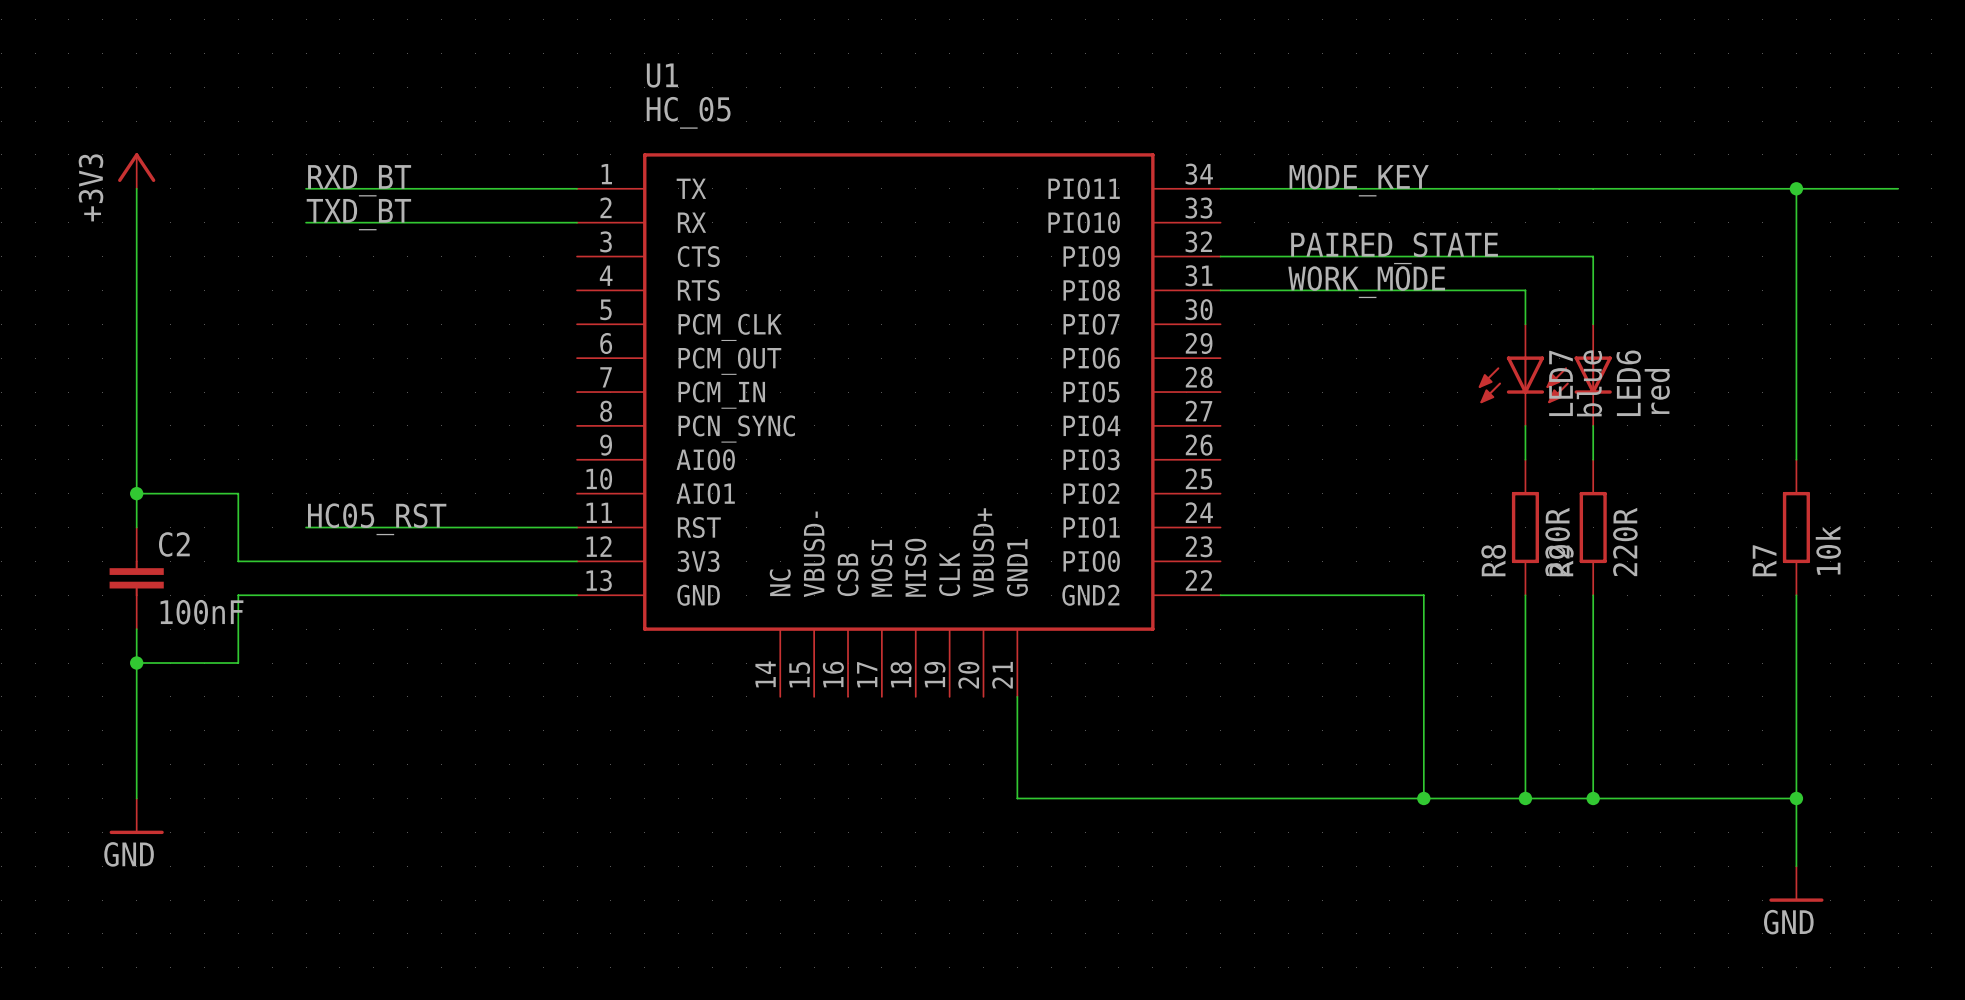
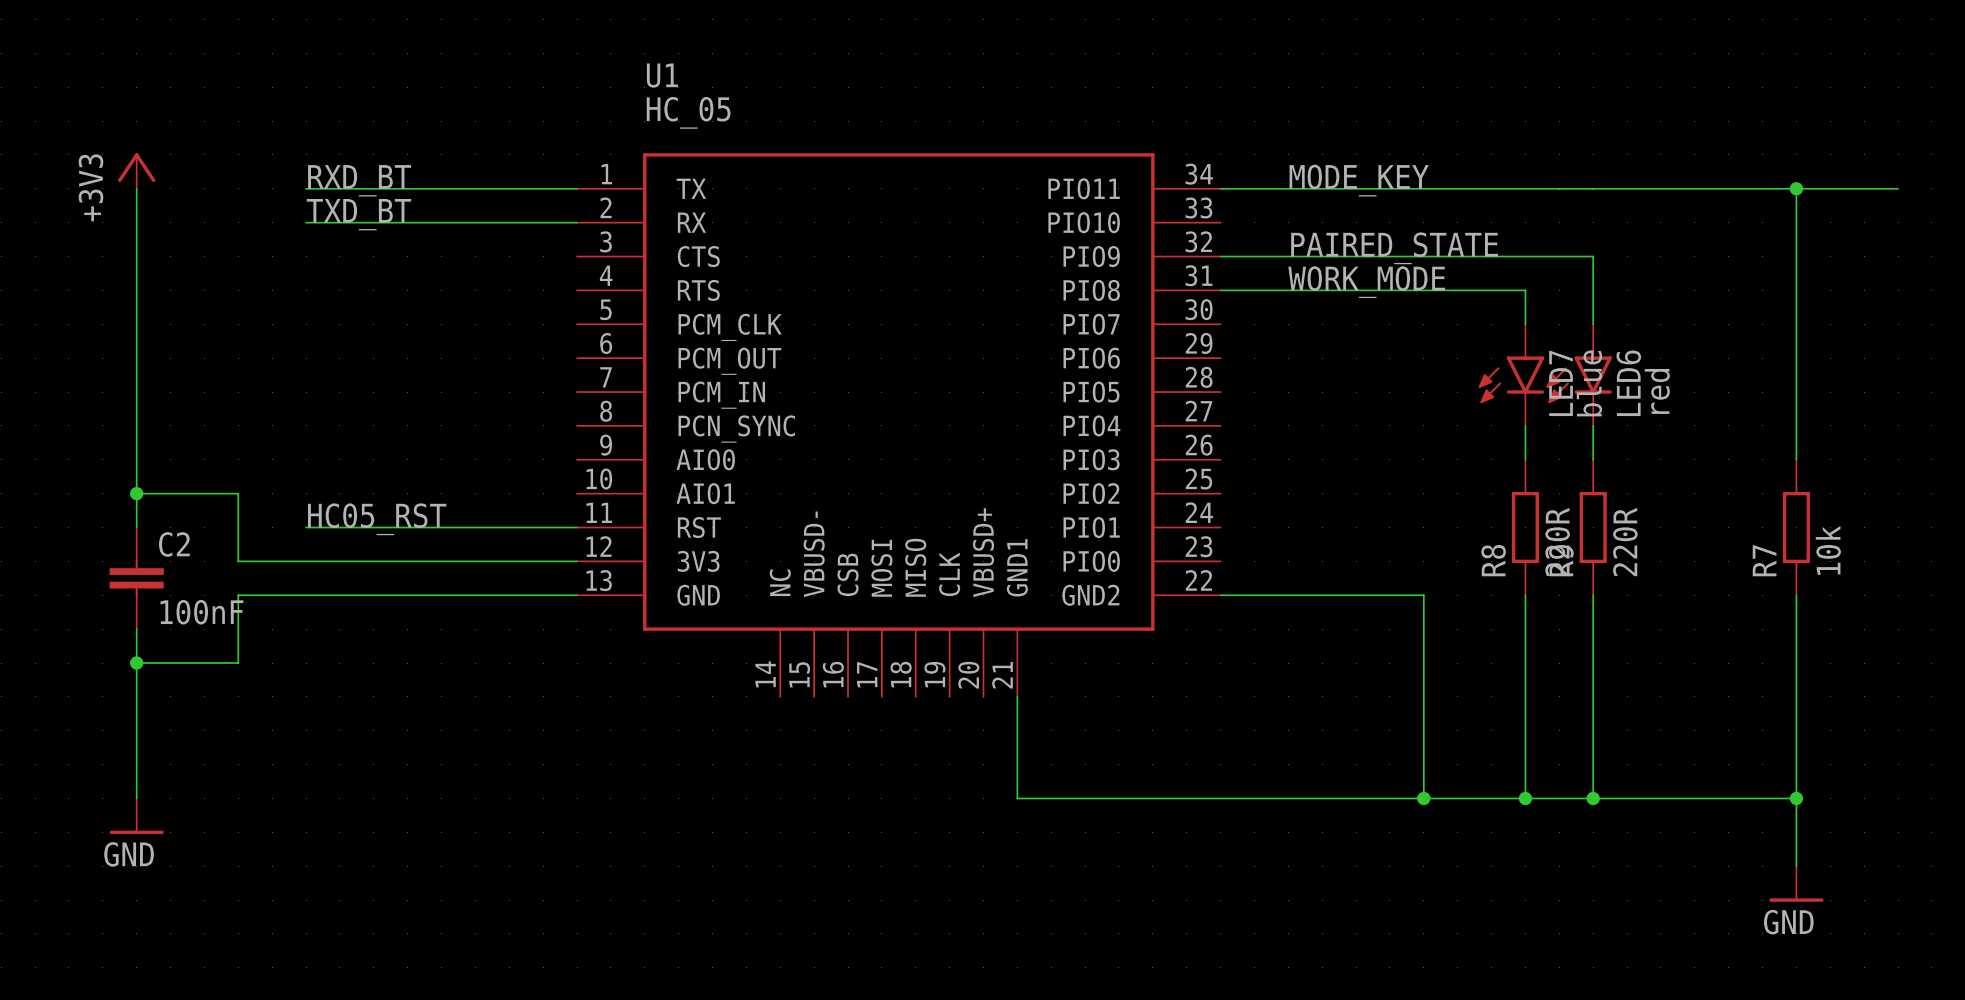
LED7 symbol: [1478, 324, 1545, 426] -> [1478, 324, 1545, 426]
LED6 symbol: [1546, 324, 1612, 426] -> [1546, 324, 1612, 426]

